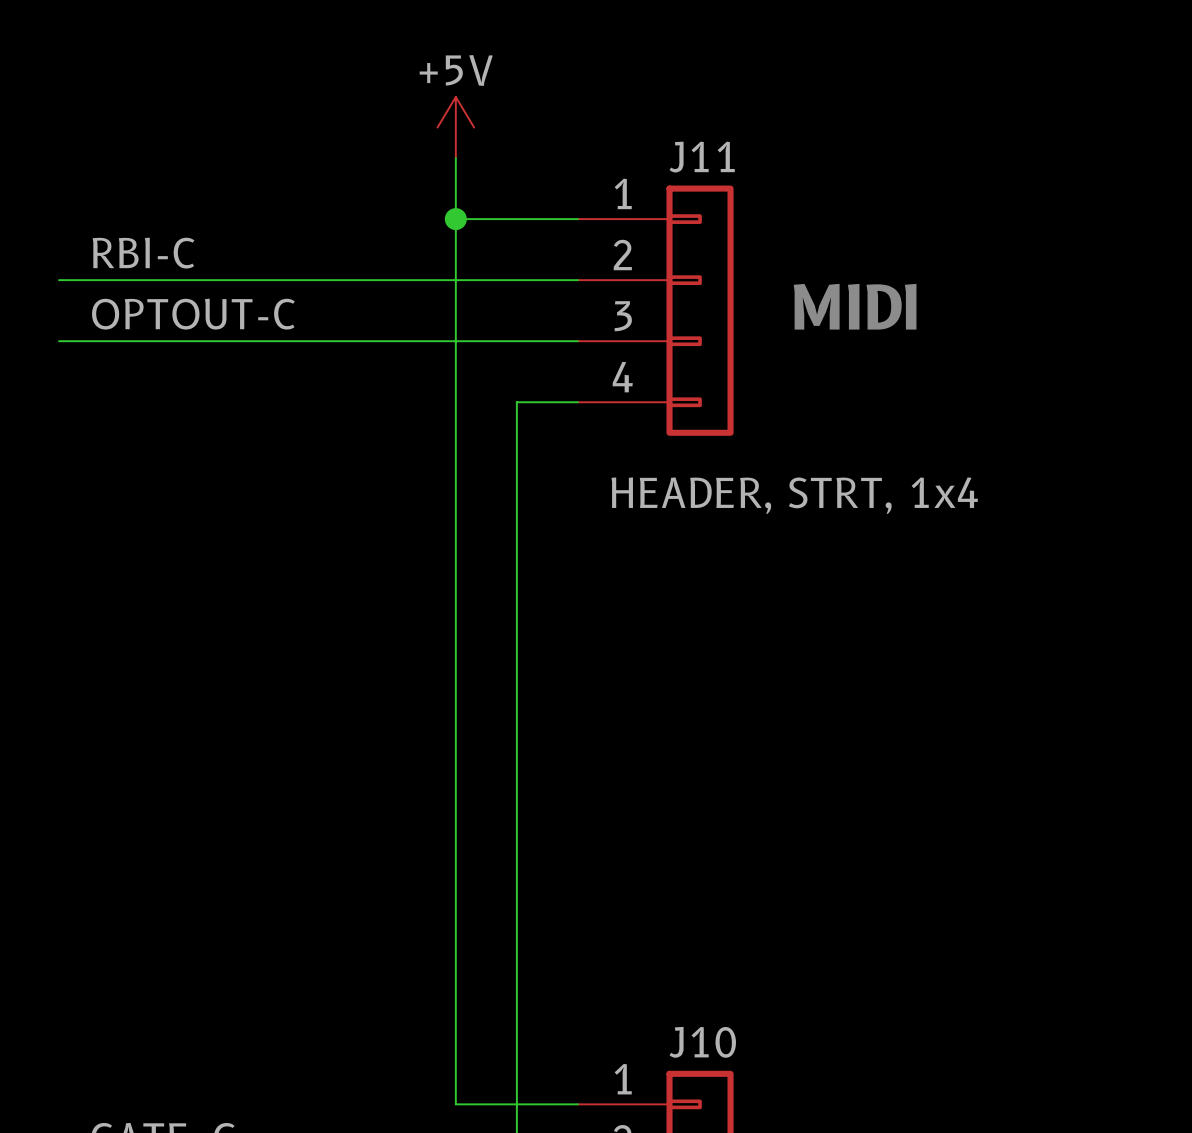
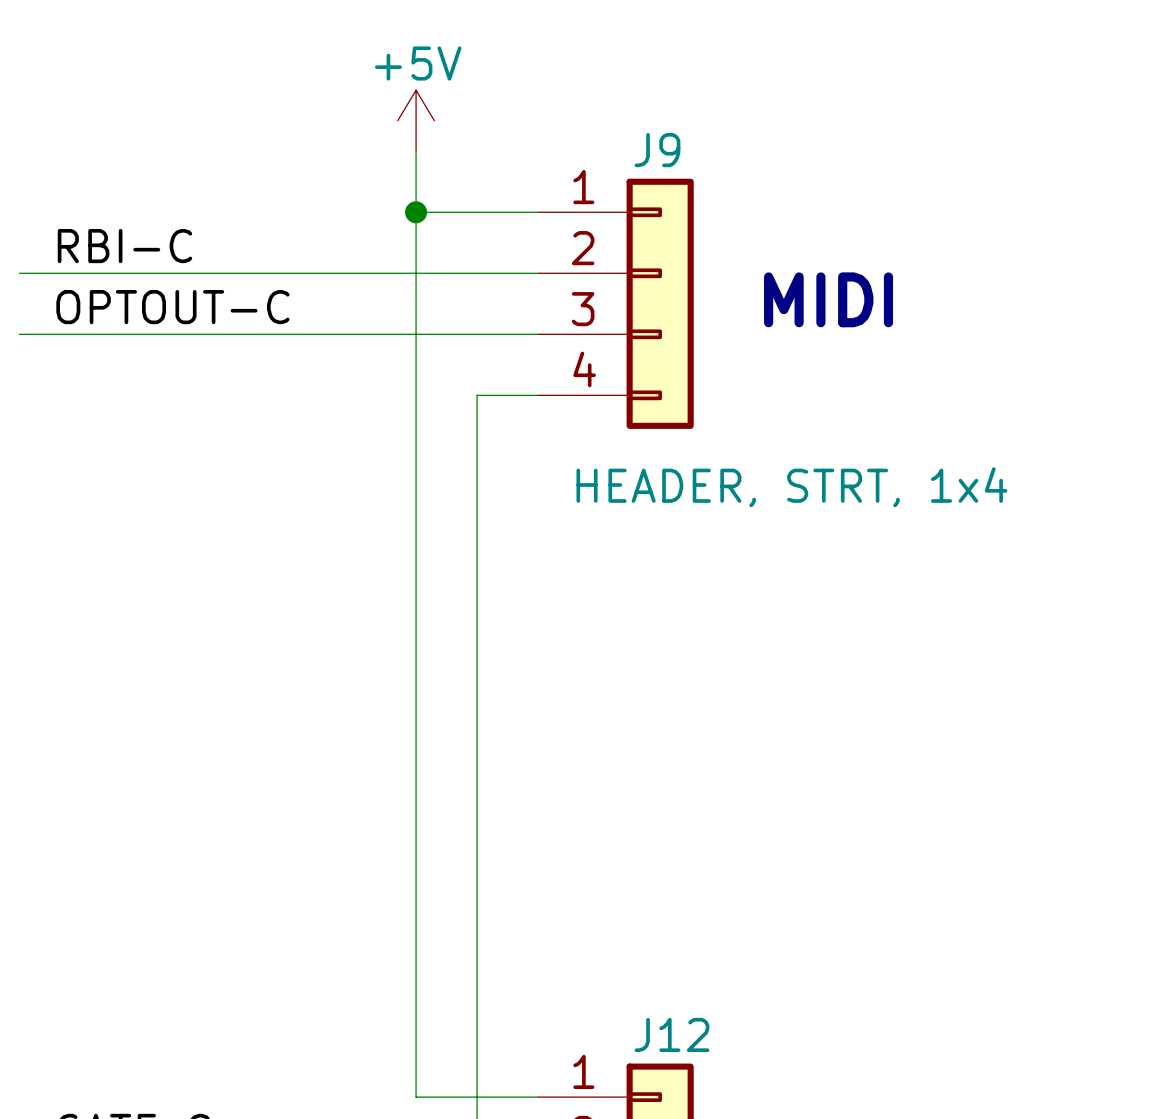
J11 name: J11 (702, 157) -> J9 (657, 150)
J10 name: J10 (702, 1042) -> J12 (672, 1034)

